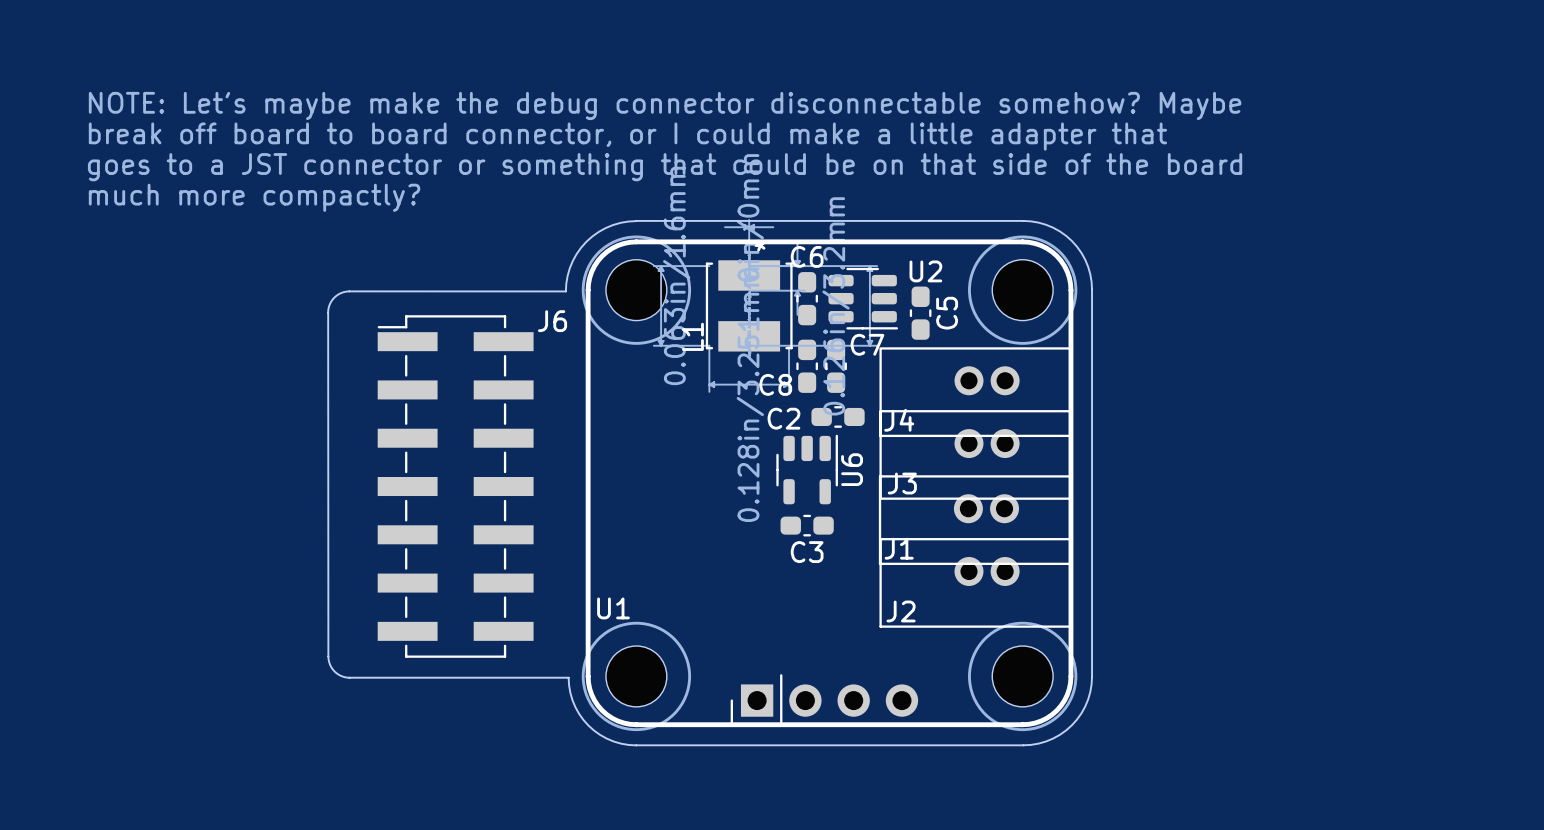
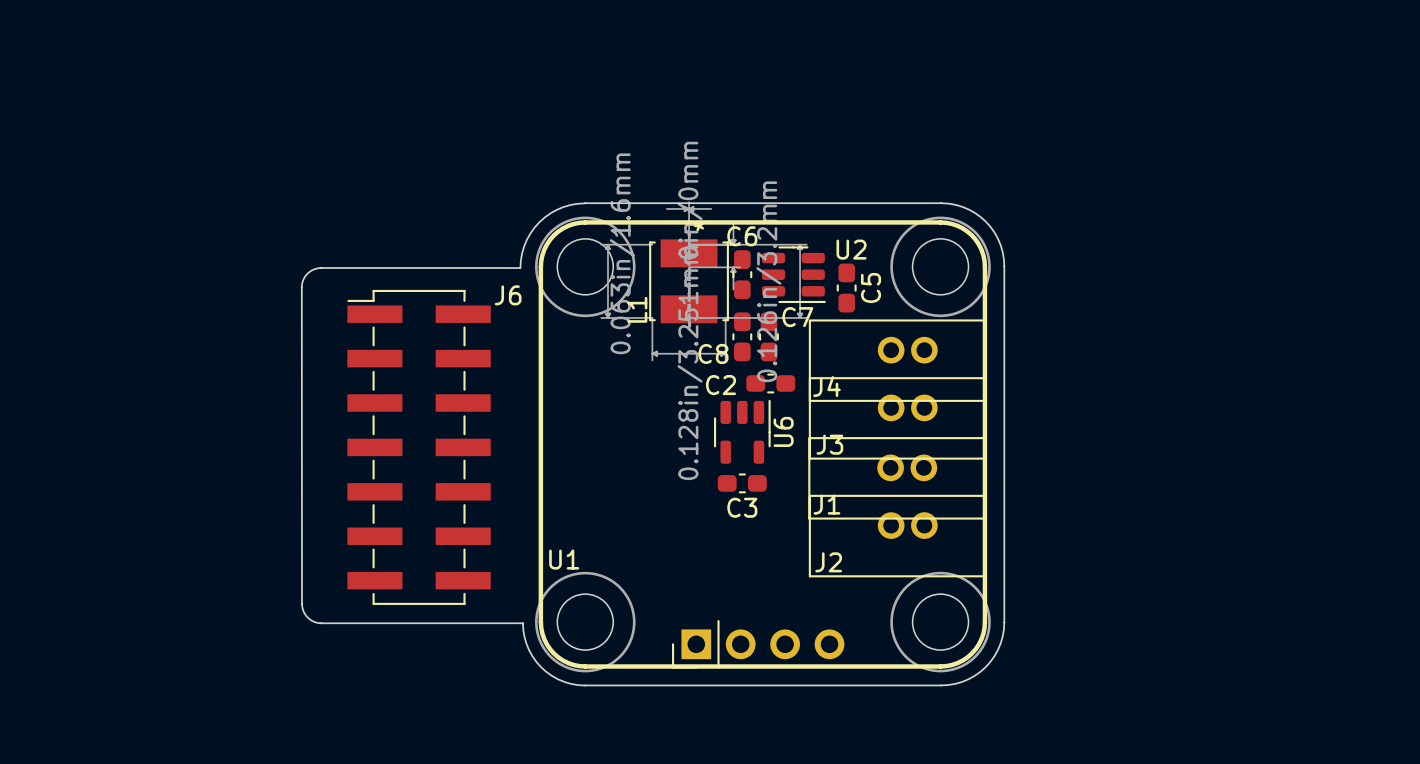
text: NOTE: Let's maybe make the debug connector disconnectable somehow? Maybe (665, 105) -> none
text: break off board to board connector, or I could make a little adapter that (627, 136) -> none
text: goes to a JST connector or something that could be on that side of the board (665, 167) -> none
text: much more compactly? (254, 197) -> none

